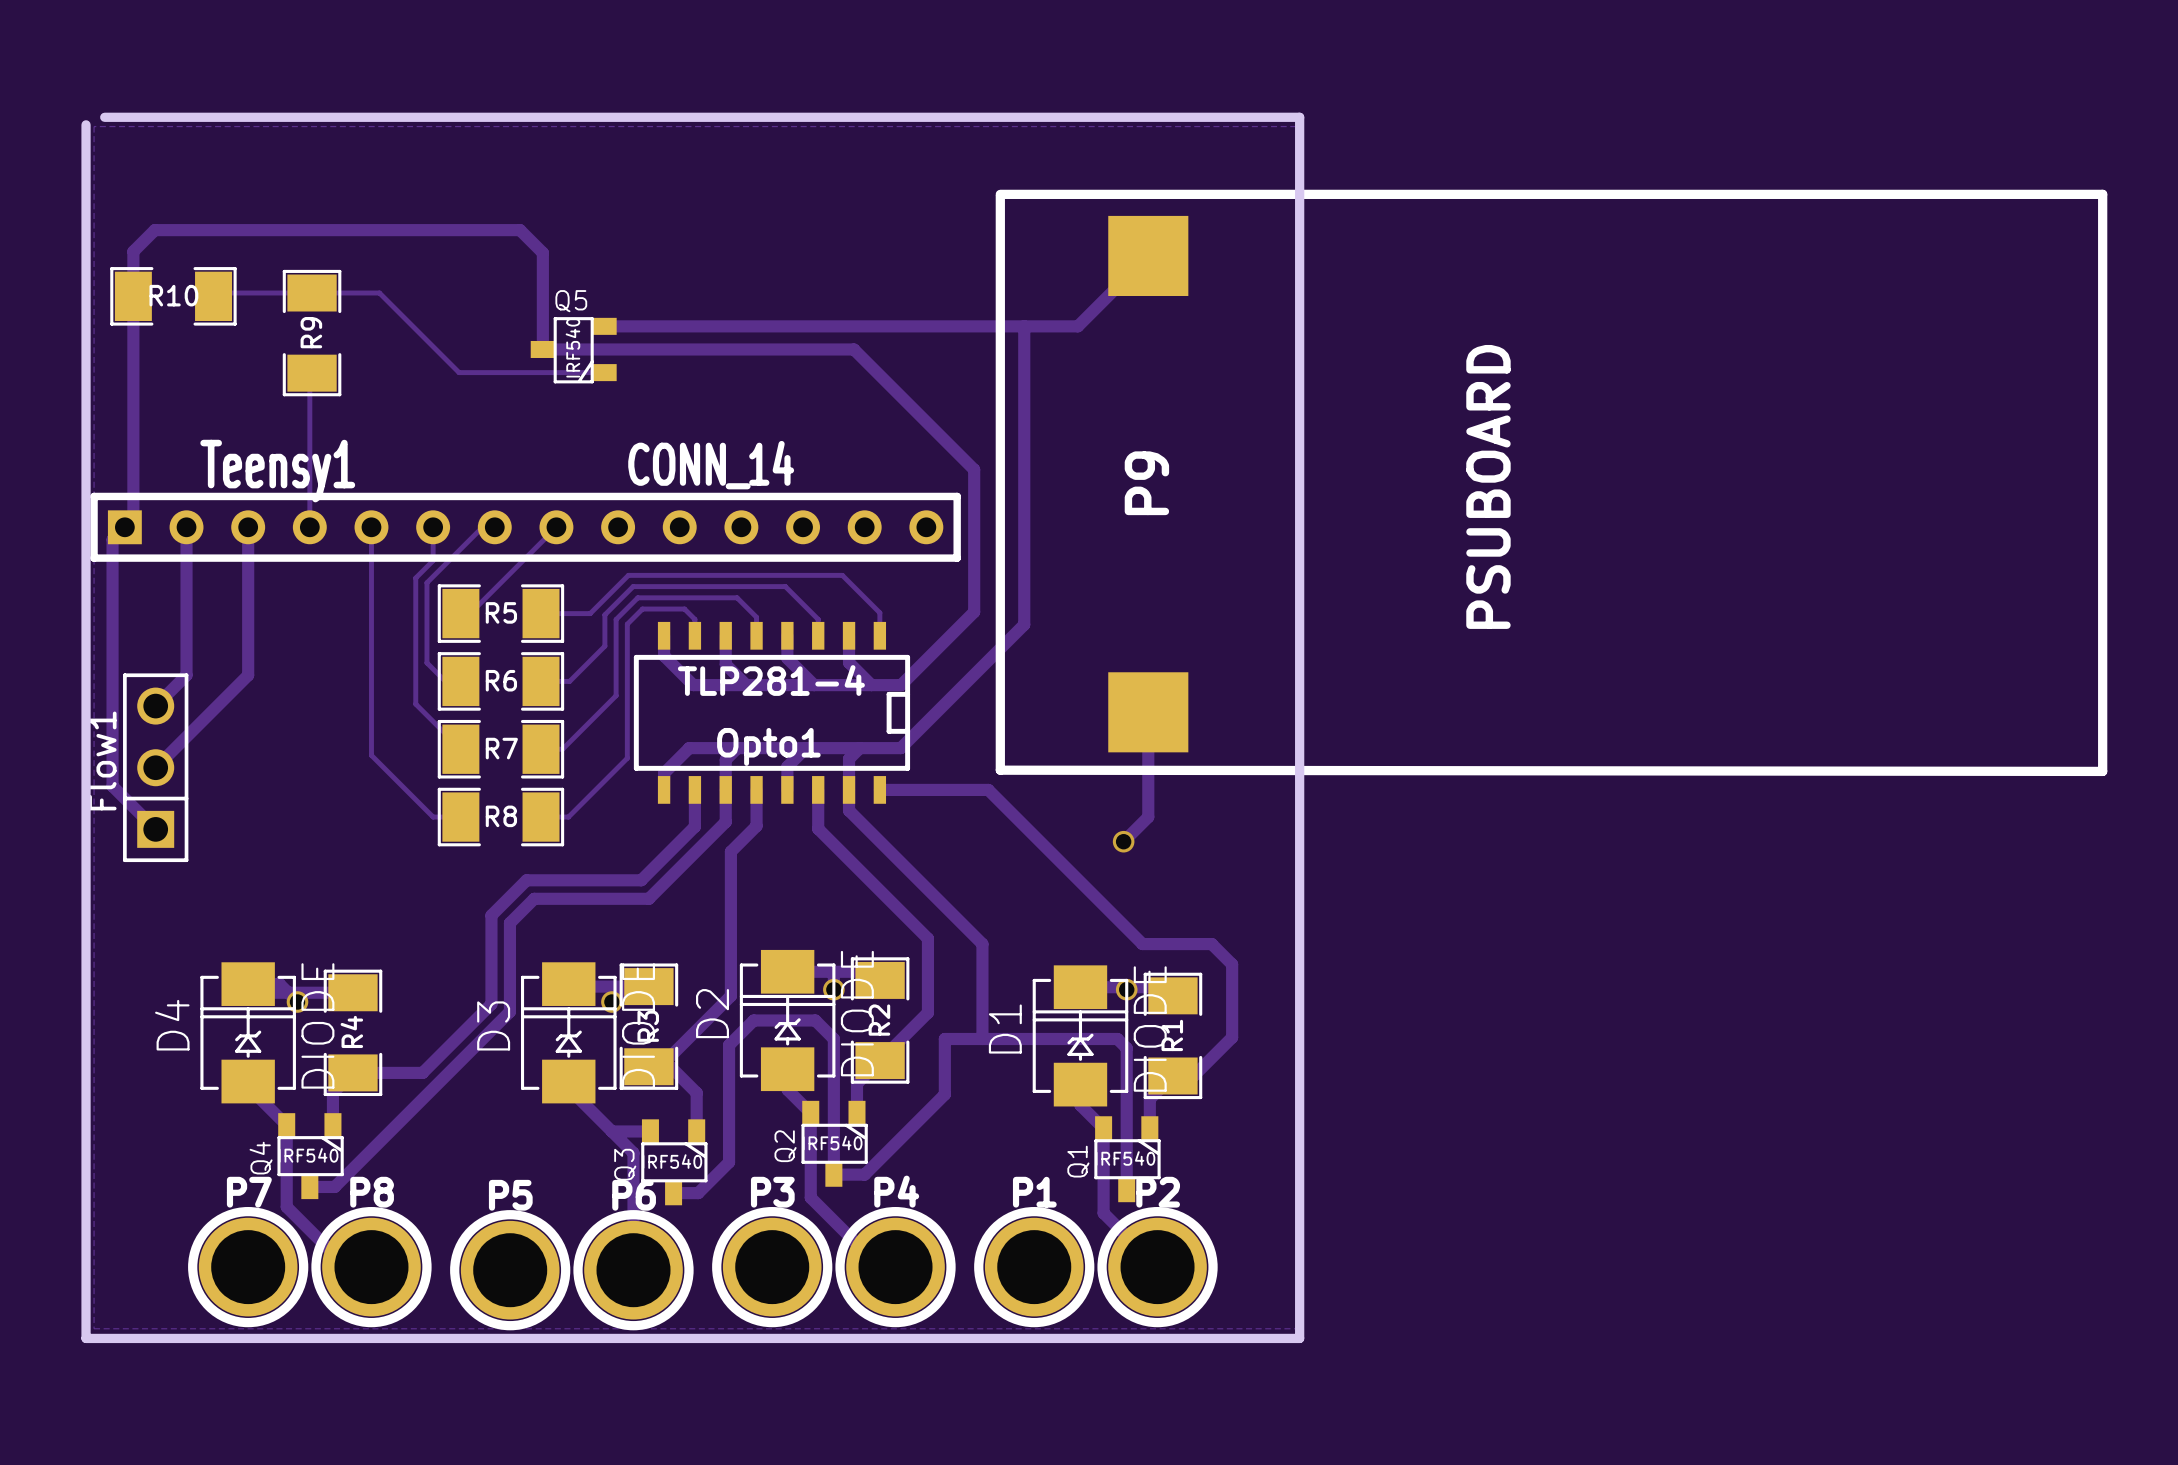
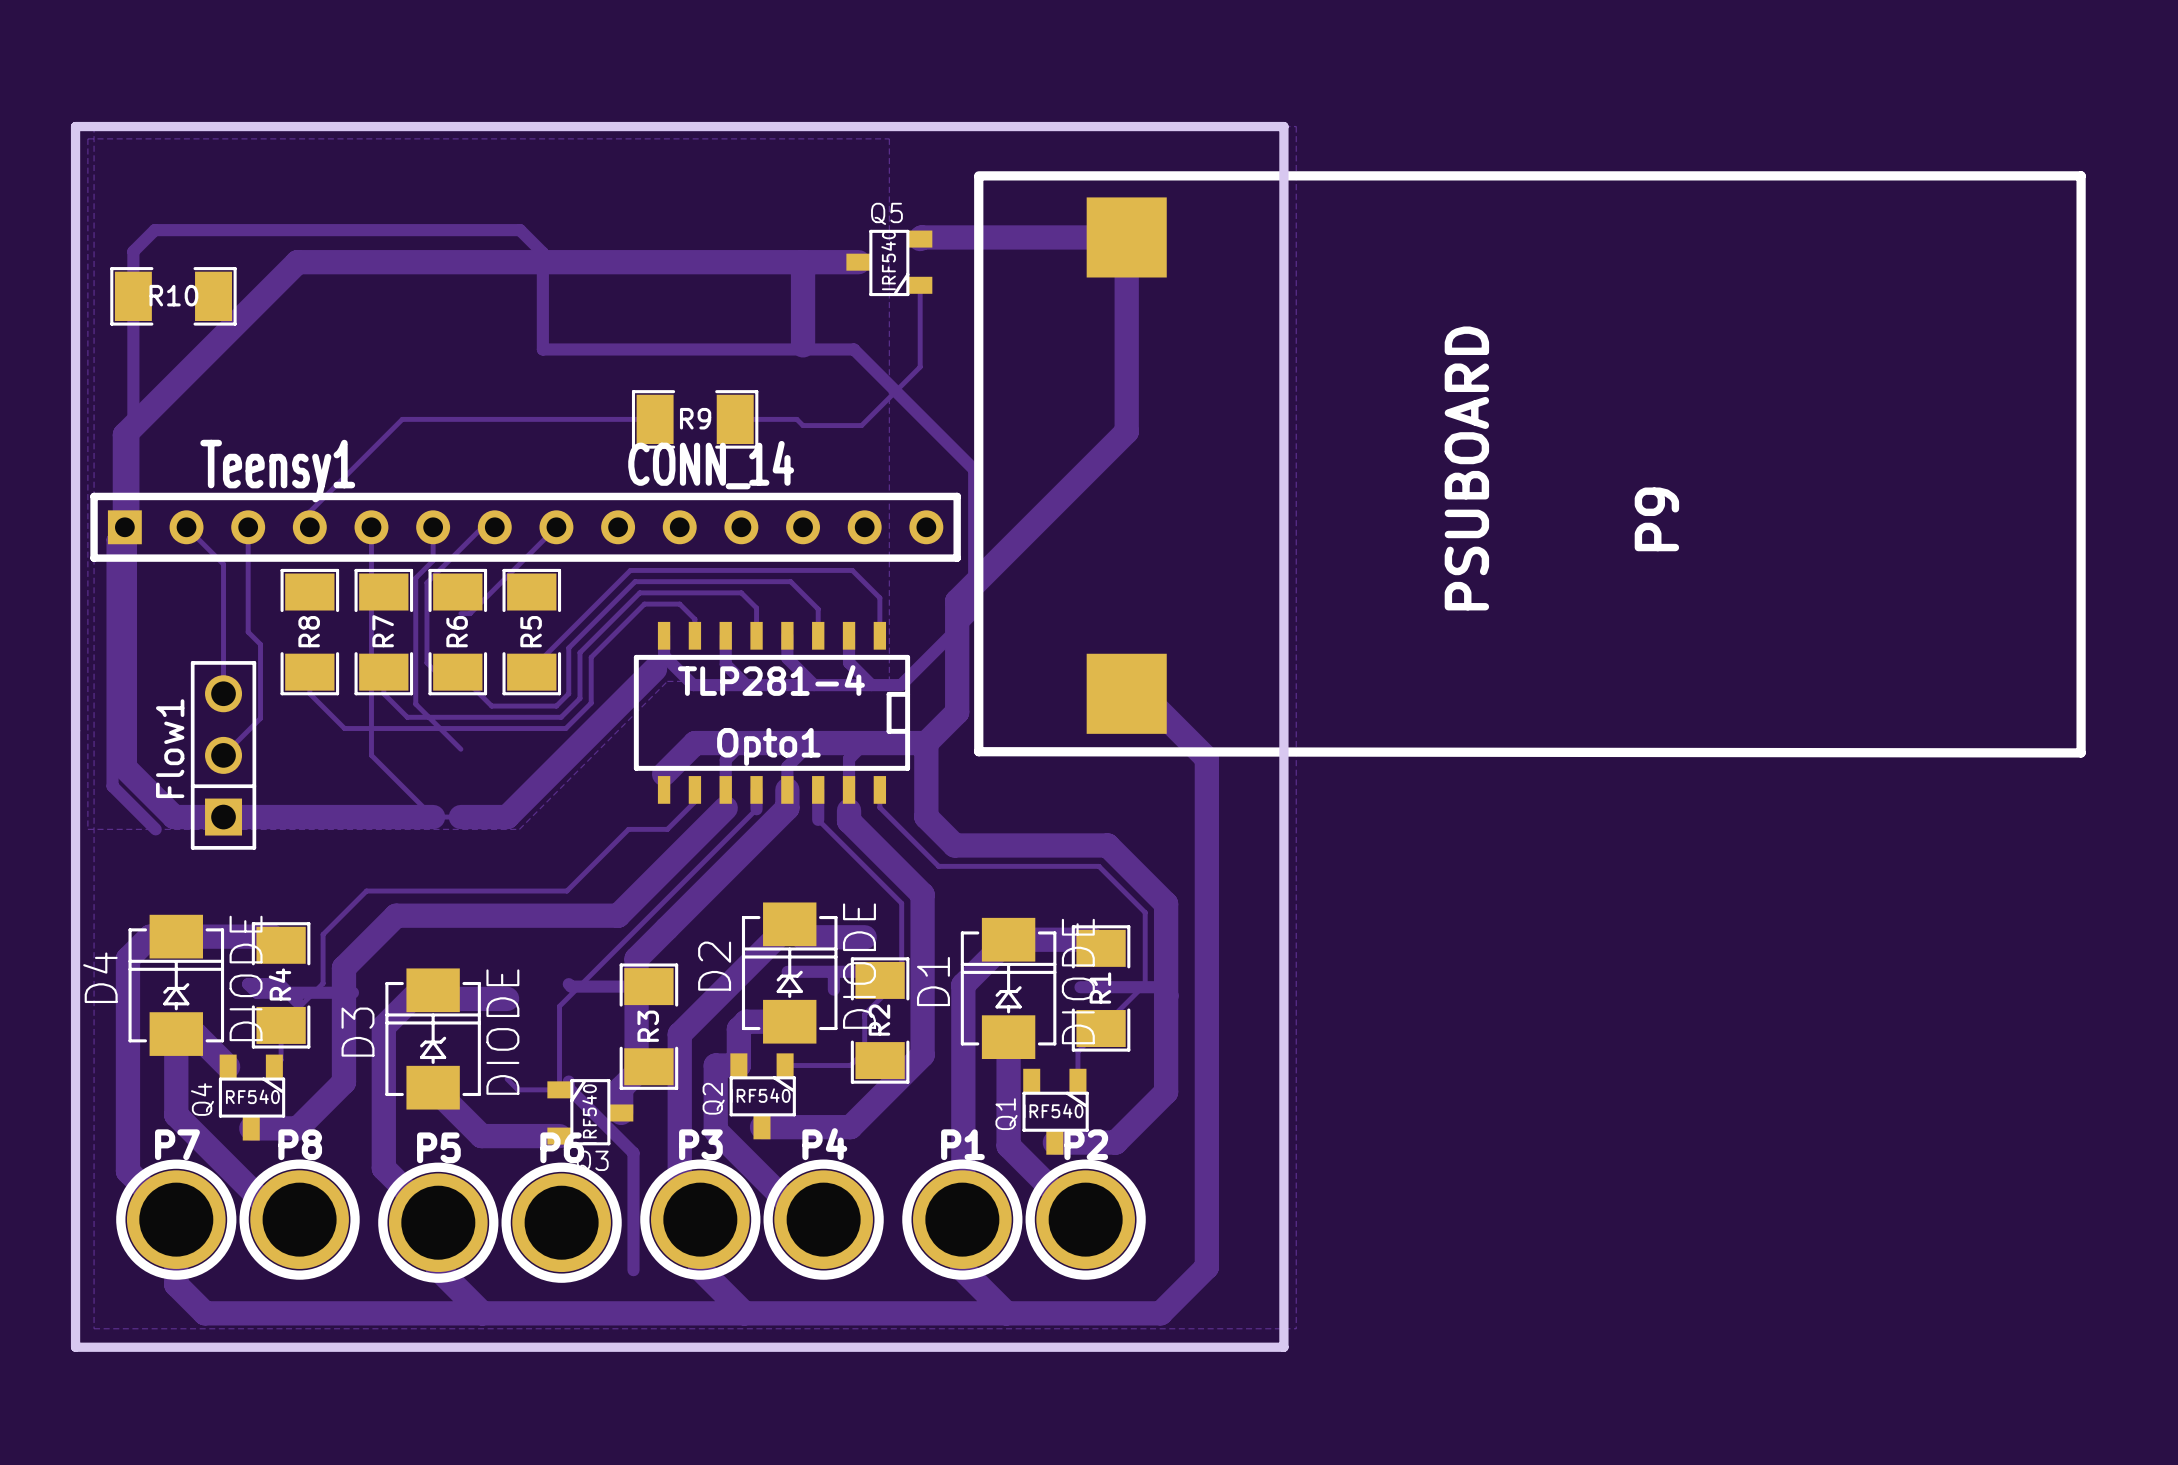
board edge: (104, 117) (1299, 117) (1299, 1338) (86, 1338) (86, 124) -> none
board edge: none -> (75, 126) (75, 1347) (1283, 1347) (1283, 126) (75, 126)
zone outline: none -> (87, 138) (889, 138) (889, 681) (667, 681) (519, 829) (87, 829) (87, 138)
track: none -> (920, 239) (921, 237) (1126, 237) (1126, 431) (957, 601) (957, 712) (926, 743)
track: (1148, 255) (1077, 326) (604, 326) -> none
track: none -> (803, 262) (803, 345)
track: none -> (858, 262) (297, 262) (124, 434) (124, 767) (174, 817) (433, 817)
track: none -> (920, 285) (920, 366) (861, 425) (803, 425) (796, 419) (735, 419)
track: (213, 296) (216, 293) (379, 293) (459, 372) (604, 372) -> none
track: (1024, 326) (1024, 624) (900, 748) (689, 748) (664, 774) -> (926, 743) (695, 743) (664, 774)
R9 rotation: 0° (312, 333) -> 90° clockwise (695, 419)
R9 position: (312, 333) -> (695, 419)
Q5 position: (573, 350) -> (889, 262)
track: (312, 373) (309, 375) (309, 511) -> (655, 419) (402, 419) (309, 511)
P9 position: (1551, 482) -> (1529, 464)
P9 name position: P9 (1146, 483) -> P9 (1656, 519)
track: (186, 527) (186, 675) (155, 706) -> (186, 527) (223, 564) (223, 693)
track width: thick (248, 527) (248, 632) -> thin (248, 527) (248, 632)
track: (684, 609) (642, 609) (627, 624) (627, 758) (568, 817) (541, 817) -> (684, 609) (679, 604) (644, 604) (591, 657) (591, 703) (565, 728) (344, 728) (309, 693) (309, 672)
track: (879, 612) (842, 575) (628, 575) (590, 613) (541, 613) -> (879, 612) (879, 597) (852, 570) (630, 570) (531, 669) (531, 672)
R5 rotation: 0° (500, 613) -> 90° clockwise (531, 632)
track: (756, 617) (737, 597) (637, 597) (616, 619) (616, 695) (562, 749) (541, 749) -> (756, 617) (756, 608) (741, 592) (639, 592) (579, 652) (579, 698) (561, 717) (407, 717) (383, 693) (383, 672)
track: (818, 619) (785, 586) (633, 586) (604, 614) (604, 646) (569, 681) (541, 681) -> (818, 619) (818, 609) (790, 581) (635, 581) (568, 648) (568, 693) (556, 706) (491, 706) (457, 672)
track: (248, 632) (248, 675) (155, 767) -> (248, 632) (260, 644) (260, 718) (223, 755)
track: none -> (655, 669) (507, 817) (460, 817)
R6 rotation: 0° (500, 681) -> 90° clockwise (457, 632)
track: none -> (1126, 693) (1142, 693) (1206, 758) (1206, 1267) (1160, 1313) (205, 1313) (176, 1284) (176, 1219) (127, 1171) (127, 958) (150, 936) (272, 936) (281, 945)
track: (1148, 712) (1148, 817) (1123, 841) -> none
track: none -> (926, 743) (926, 817) (954, 845) (1107, 845) (1166, 903) (1166, 1092) (1115, 1142) (1054, 1142)
R7 rotation: 0° (500, 749) -> 90° clockwise (383, 632)
R7 position: (500, 749) -> (383, 632)
Flow1 position: (155, 767) -> (223, 755)
track: none -> (787, 789) (787, 808) (636, 958) (636, 1072) (621, 1088) (621, 1112)
track: (879, 789) (988, 789) (1142, 944) (1211, 944) (1232, 964) (1232, 1037) (1193, 1075) (1172, 1075) (1149, 1099) (1149, 1128) -> (879, 789) (879, 807) (938, 866) (1098, 866) (1145, 912) (1145, 984) (1077, 1051) (1077, 1080)
track: (694, 801) (694, 826) (641, 880) (526, 880) (491, 915) (491, 1004) (422, 1072) (352, 1072) (332, 1092) (332, 1125) -> (694, 801) (667, 829) (628, 829) (566, 891) (366, 891) (323, 934) (323, 983) (281, 1025) (281, 1060) (274, 1066)
track: (725, 808) (725, 821) (648, 898) (534, 898) (509, 923) (509, 1011) (334, 1186) (309, 1186) -> (725, 808) (618, 915) (396, 915) (343, 967) (343, 1082) (297, 1128) (251, 1128)
track: (756, 809) (756, 826) (730, 851) (730, 995) (660, 1066) -> (756, 809) (559, 1006) (559, 1089) (517, 1089) (507, 1079)
track: (849, 810) (982, 944) (982, 1038) -> (849, 810) (849, 821) (922, 894) (922, 1055) (850, 1127) (761, 1127)
R8 rotation: 0° (500, 817) -> 90° clockwise (309, 632)
R8 position: (500, 817) -> (309, 632)
track: (818, 819) (818, 828) (927, 938) (927, 1012) (856, 1083) (856, 1112) -> (818, 819) (901, 903) (901, 977) (864, 1014) (864, 1051) (850, 1065) (785, 1065)
via: (1123, 841) -> none
track: none -> (864, 937) (802, 937) (789, 924) (679, 1034) (679, 1199) (700, 1219) (700, 1269) (744, 1313)
track: none -> (1101, 948) (1092, 939) (1008, 939) (963, 984) (962, 1269) (1006, 1313)
via: (833, 989) -> none
via: (1126, 989) -> none
track: none -> (507, 998) (441, 998) (433, 990) (420, 990) (383, 1026) (383, 1168) (438, 1222) (438, 1269) (482, 1313)
via: (297, 1002) -> none
via: (611, 1002) -> none
D2 position: (787, 1020) -> (789, 973)
track: none -> (789, 1021) (746, 1021) (738, 1029) (738, 1065) (715, 1065) (715, 1130) (804, 1219) (823, 1219)
D4 position: (248, 1032) -> (176, 985)
R4 position: (352, 1032) -> (281, 985)
D3 position: (568, 1032) -> (433, 1038)
D1 position: (1080, 1035) -> (1008, 988)
R1 position: (1172, 1035) -> (1101, 988)
track: none -> (1008, 1037) (1008, 1145) (1082, 1219) (1085, 1219)
track: none -> (228, 1066) (195, 1034) (176, 1034) (176, 1115) (280, 1219) (299, 1219)
track: (648, 1066) (670, 1066) (696, 1092) (696, 1131) -> none
track: (787, 1069) (787, 1089) (810, 1112) (810, 1197) (880, 1267) (895, 1267) -> none
track: (248, 1081) (248, 1086) (286, 1125) (286, 1207) (346, 1267) (371, 1267) -> none
track: (1080, 1084) (1080, 1105) (1103, 1128) (1103, 1213) (1157, 1267) -> none
track: none -> (433, 1087) (481, 1136) (559, 1136)
track: (611, 1131) (650, 1131) -> none
Q2 position: (834, 1143) -> (762, 1096)
Q4 position: (310, 1156) -> (252, 1097)
Q1 position: (1127, 1159) -> (1055, 1111)
Q3 rotation: 0° (674, 1162) -> 90° counterclockwise (590, 1112)
Q3 position: (674, 1162) -> (590, 1112)
track: (1126, 1190) (1126, 1048) (1117, 1038) (944, 1038) (944, 1094) (864, 1174) (833, 1174) (833, 1038) (815, 1020) (753, 1020) (729, 1045) (729, 1162) (698, 1193) (673, 1193) -> none
P7 position: (248, 1267) -> (176, 1219)
P8 position: (371, 1267) -> (299, 1219)
P3 position: (772, 1267) -> (700, 1219)
P4 position: (895, 1267) -> (823, 1219)
P1 position: (1034, 1267) -> (962, 1219)
P2 position: (1157, 1267) -> (1085, 1219)
P5 position: (510, 1270) -> (438, 1222)
P6 position: (633, 1270) -> (561, 1222)

